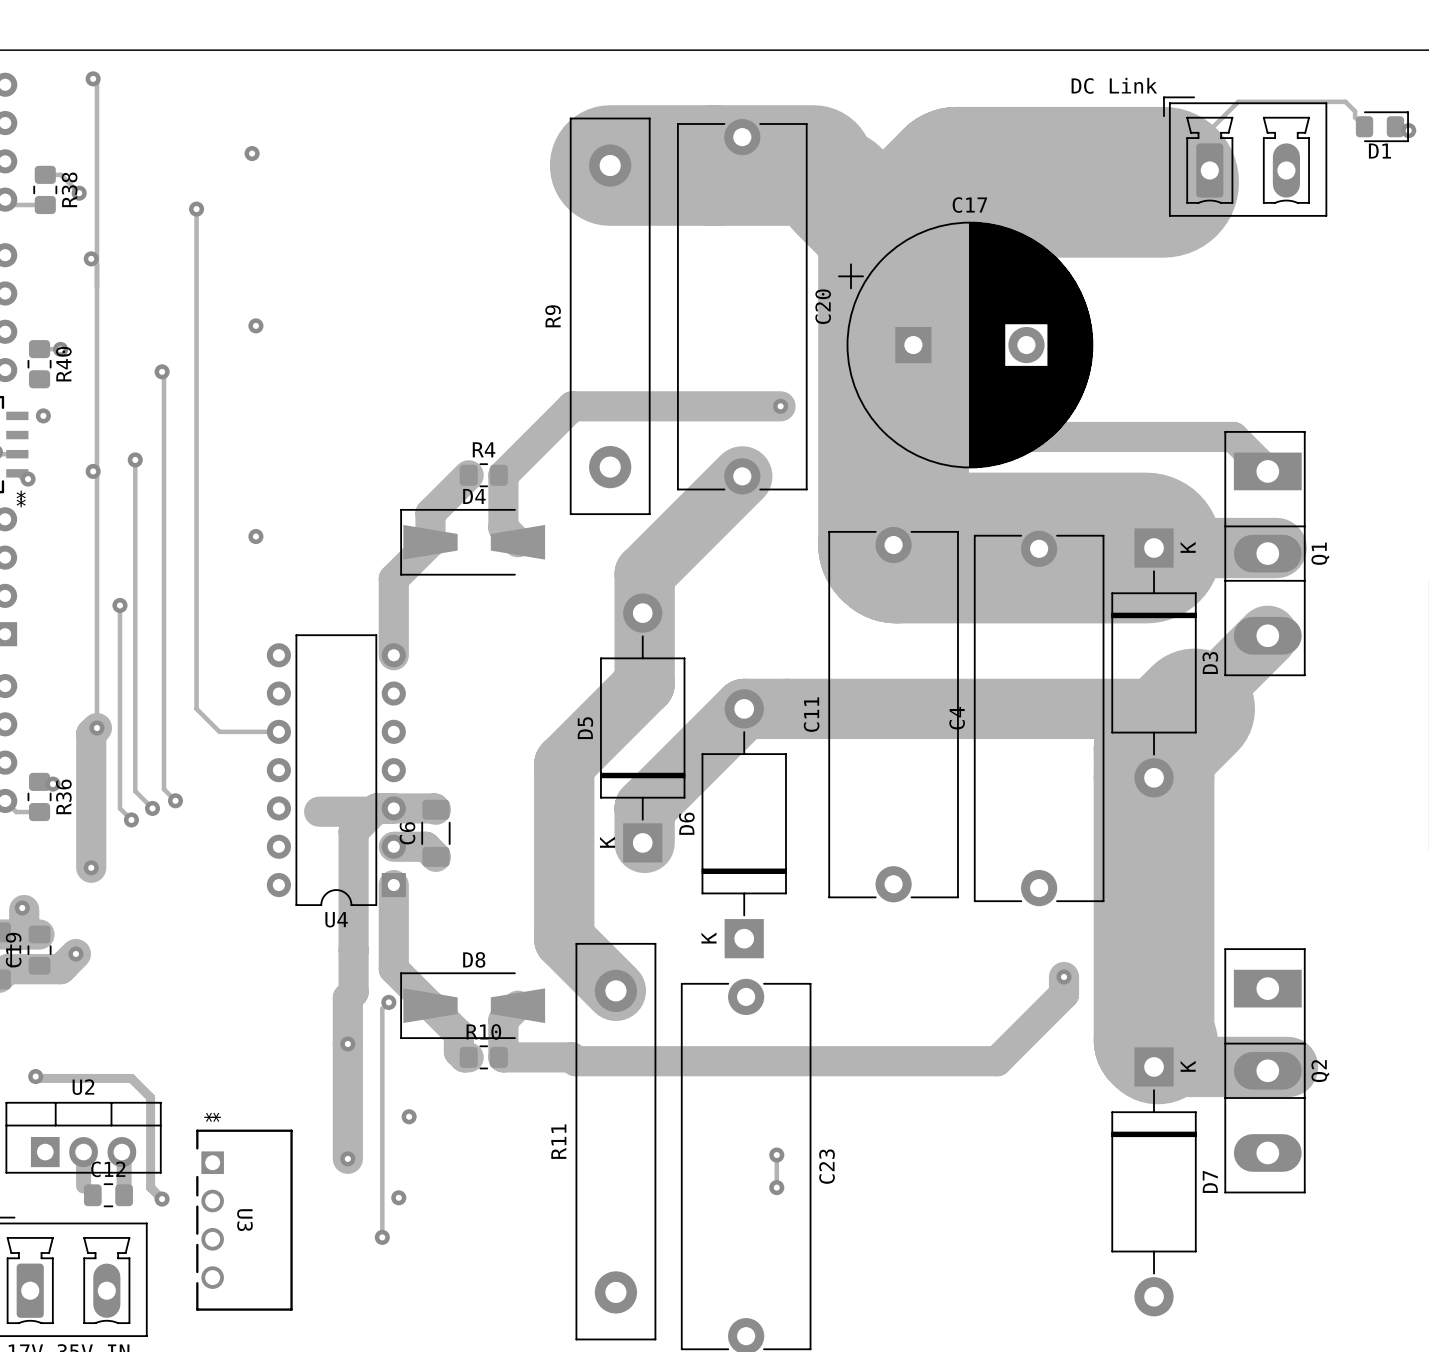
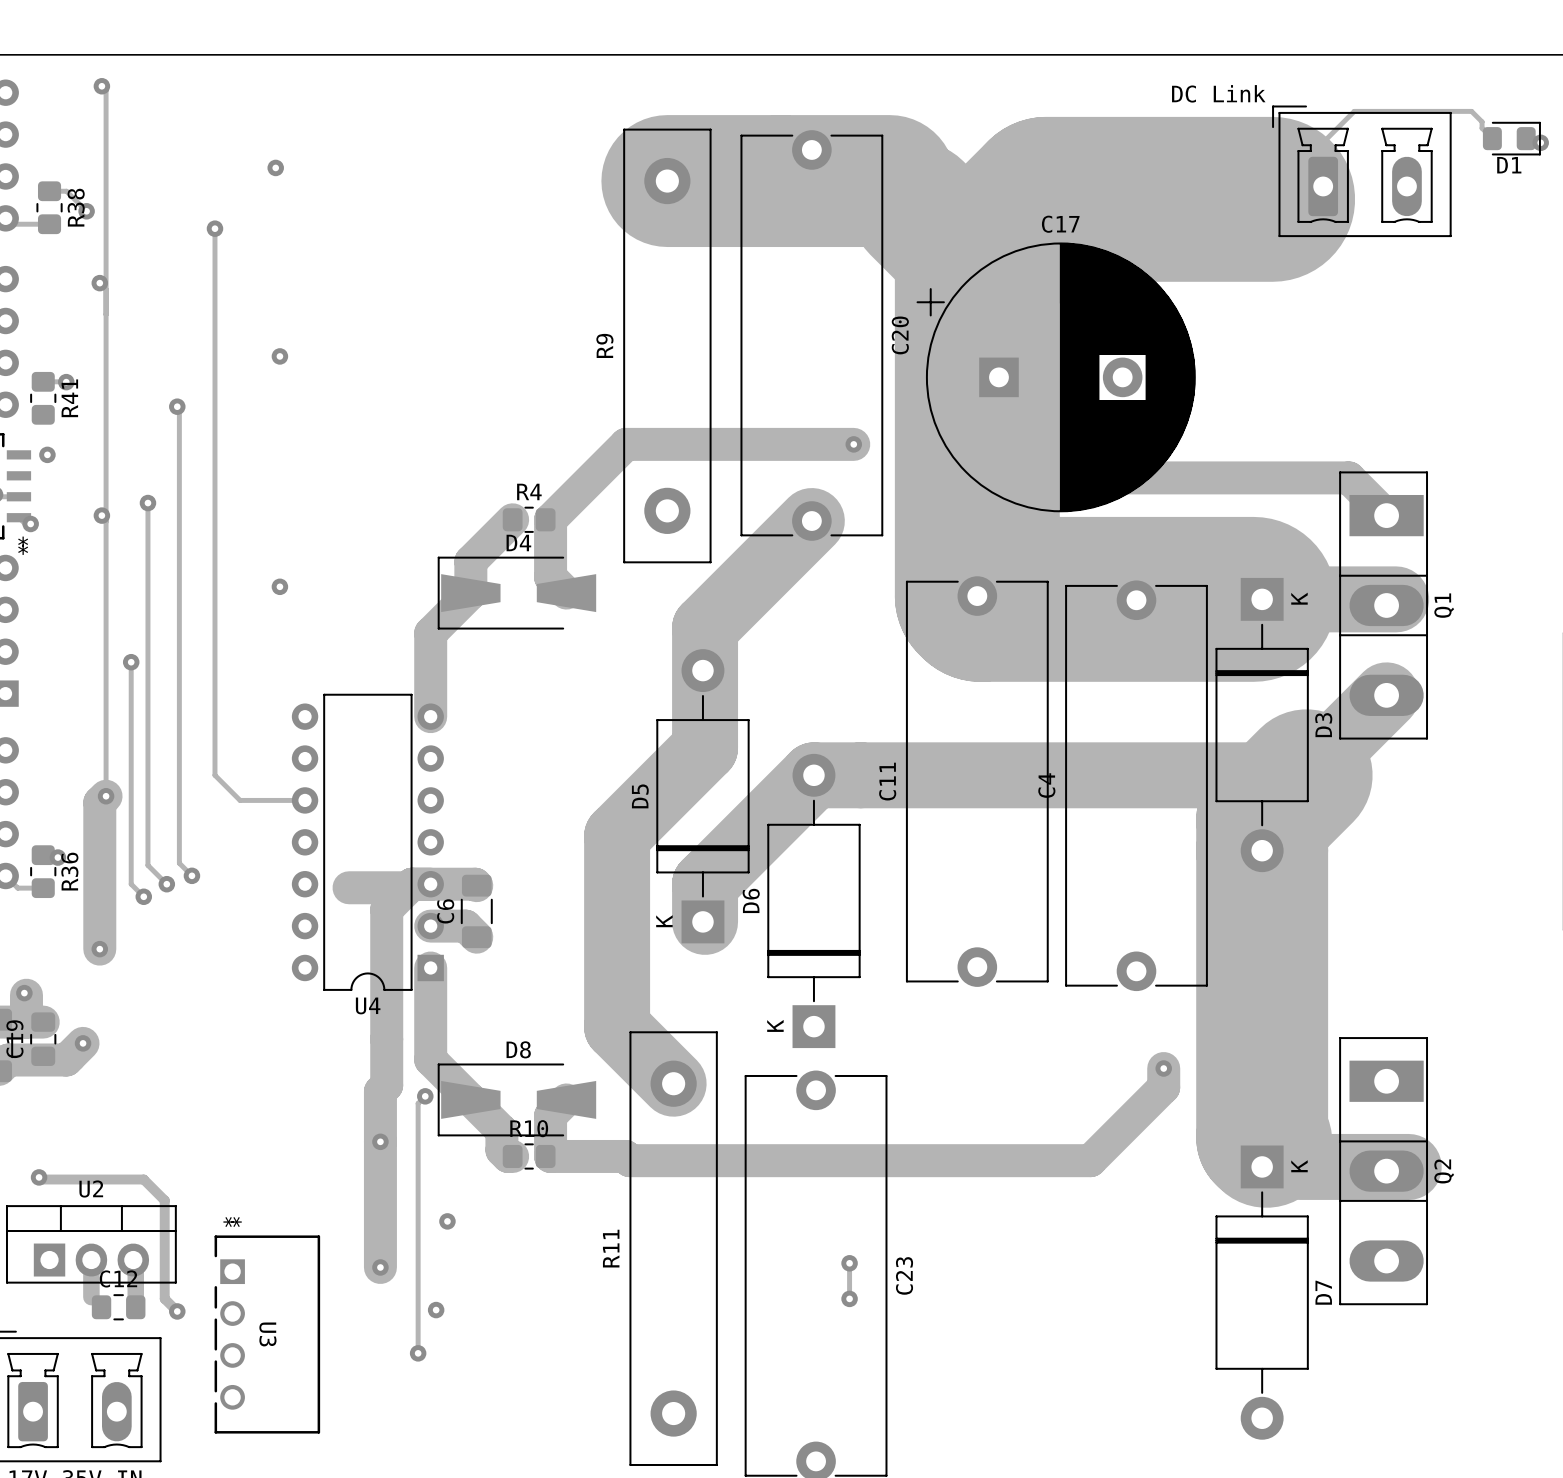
R40 name: R40 (63, 364) -> R41 (69, 398)

